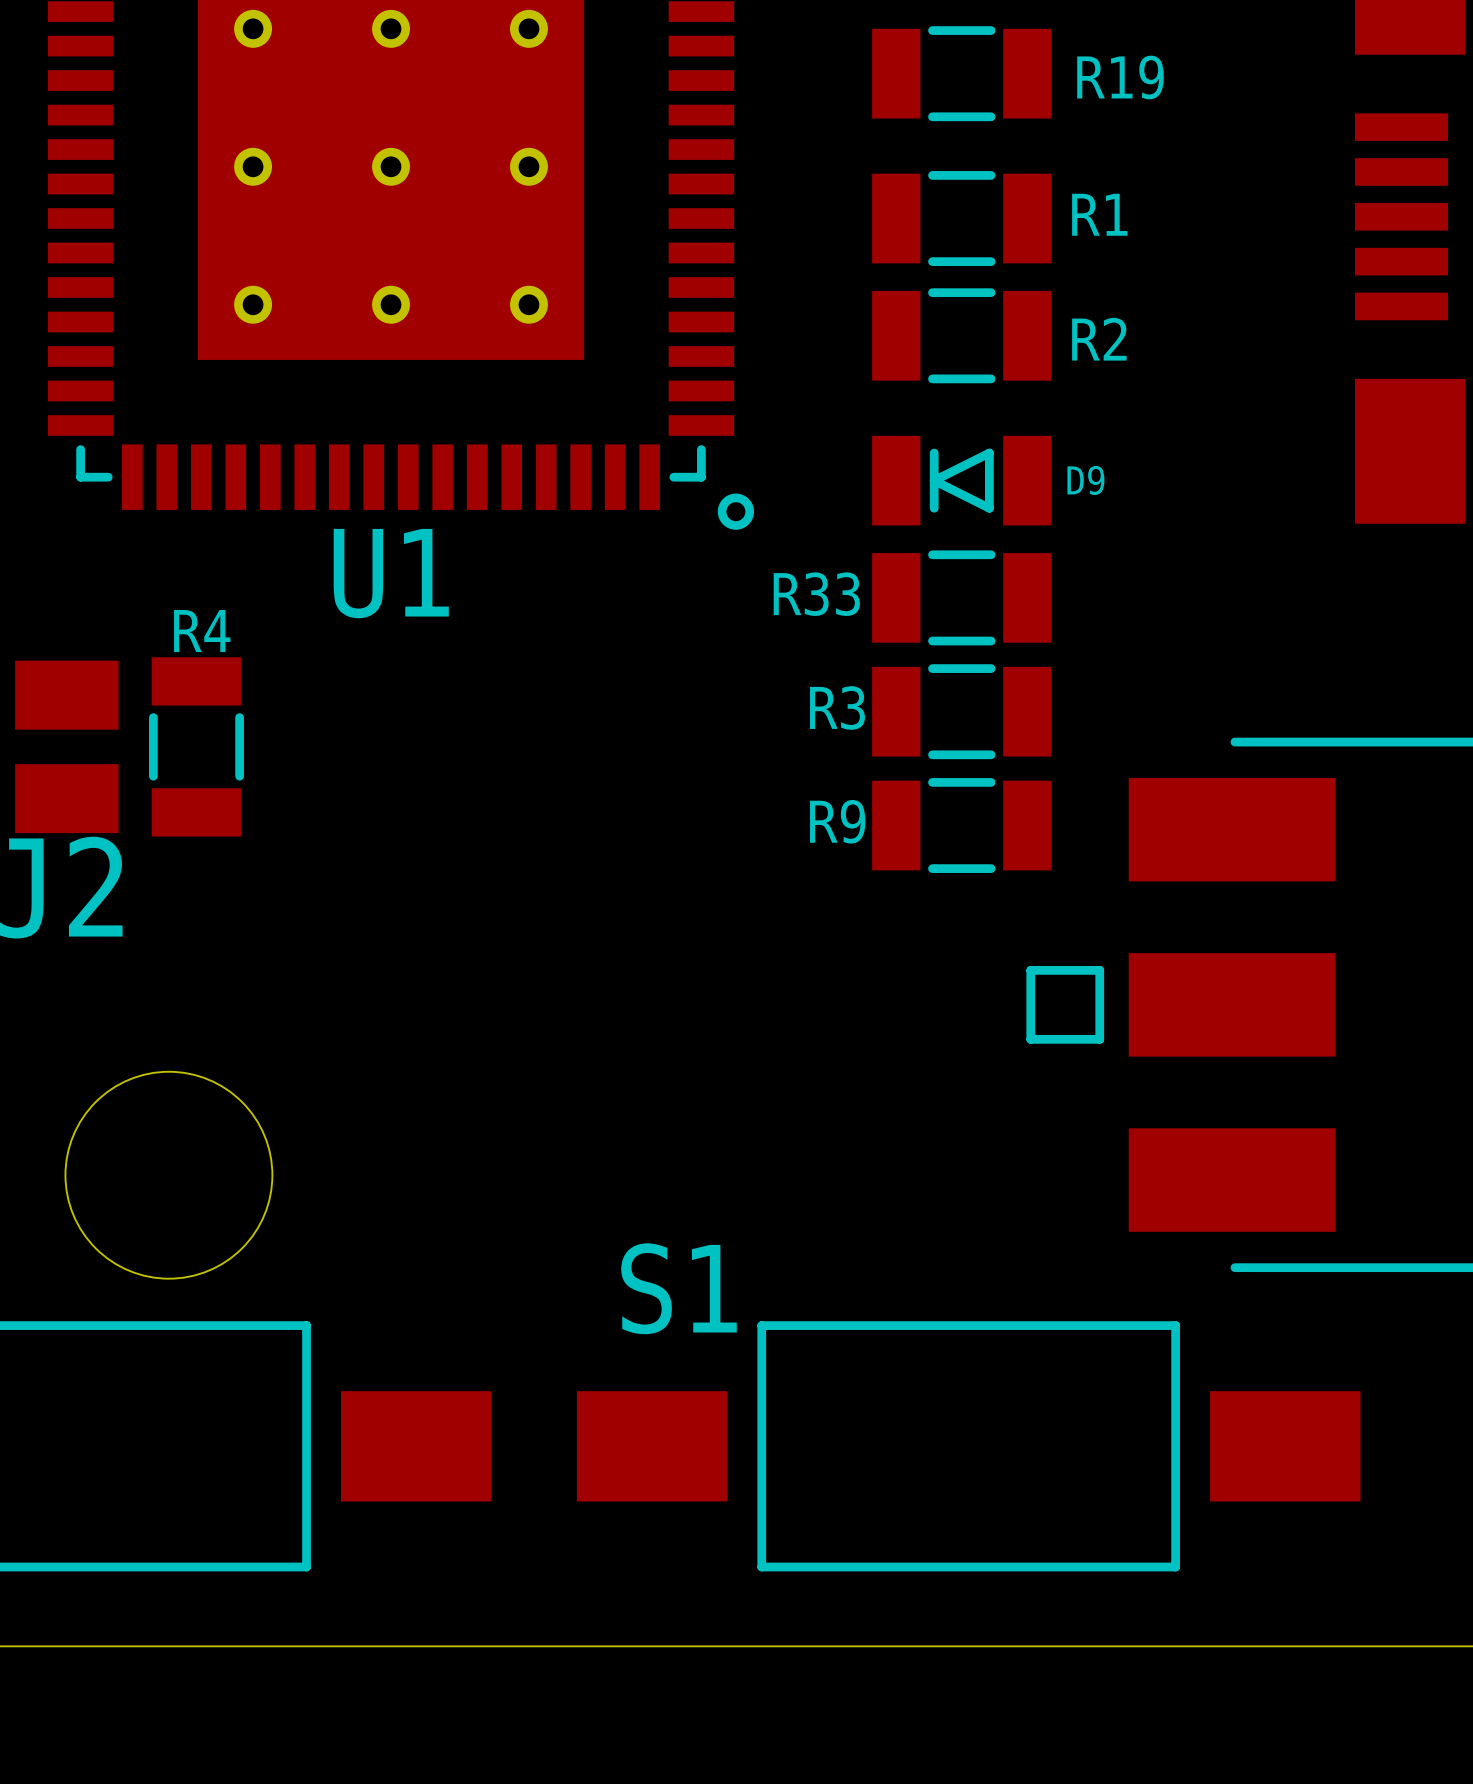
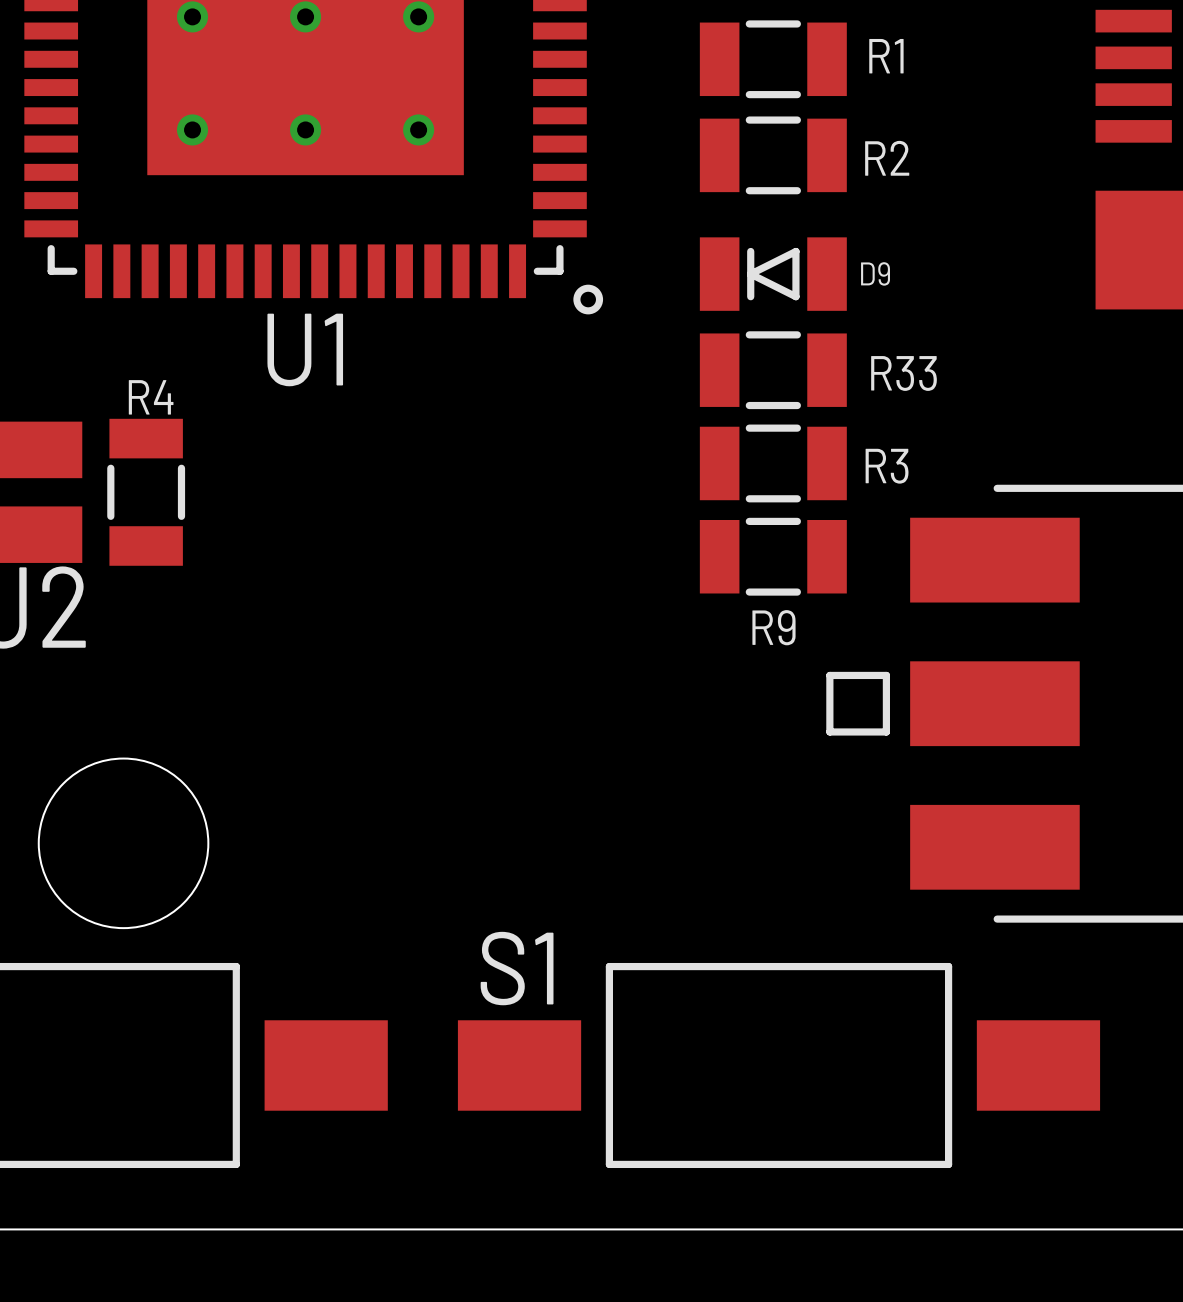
R33 name position: R33 (816, 594) -> R33 (904, 373)
R3 name position: R3 (837, 707) -> R3 (887, 466)
R9 name position: R9 (837, 821) -> R9 (773, 627)
S1 name position: S1 (678, 1288) -> S1 (517, 968)

